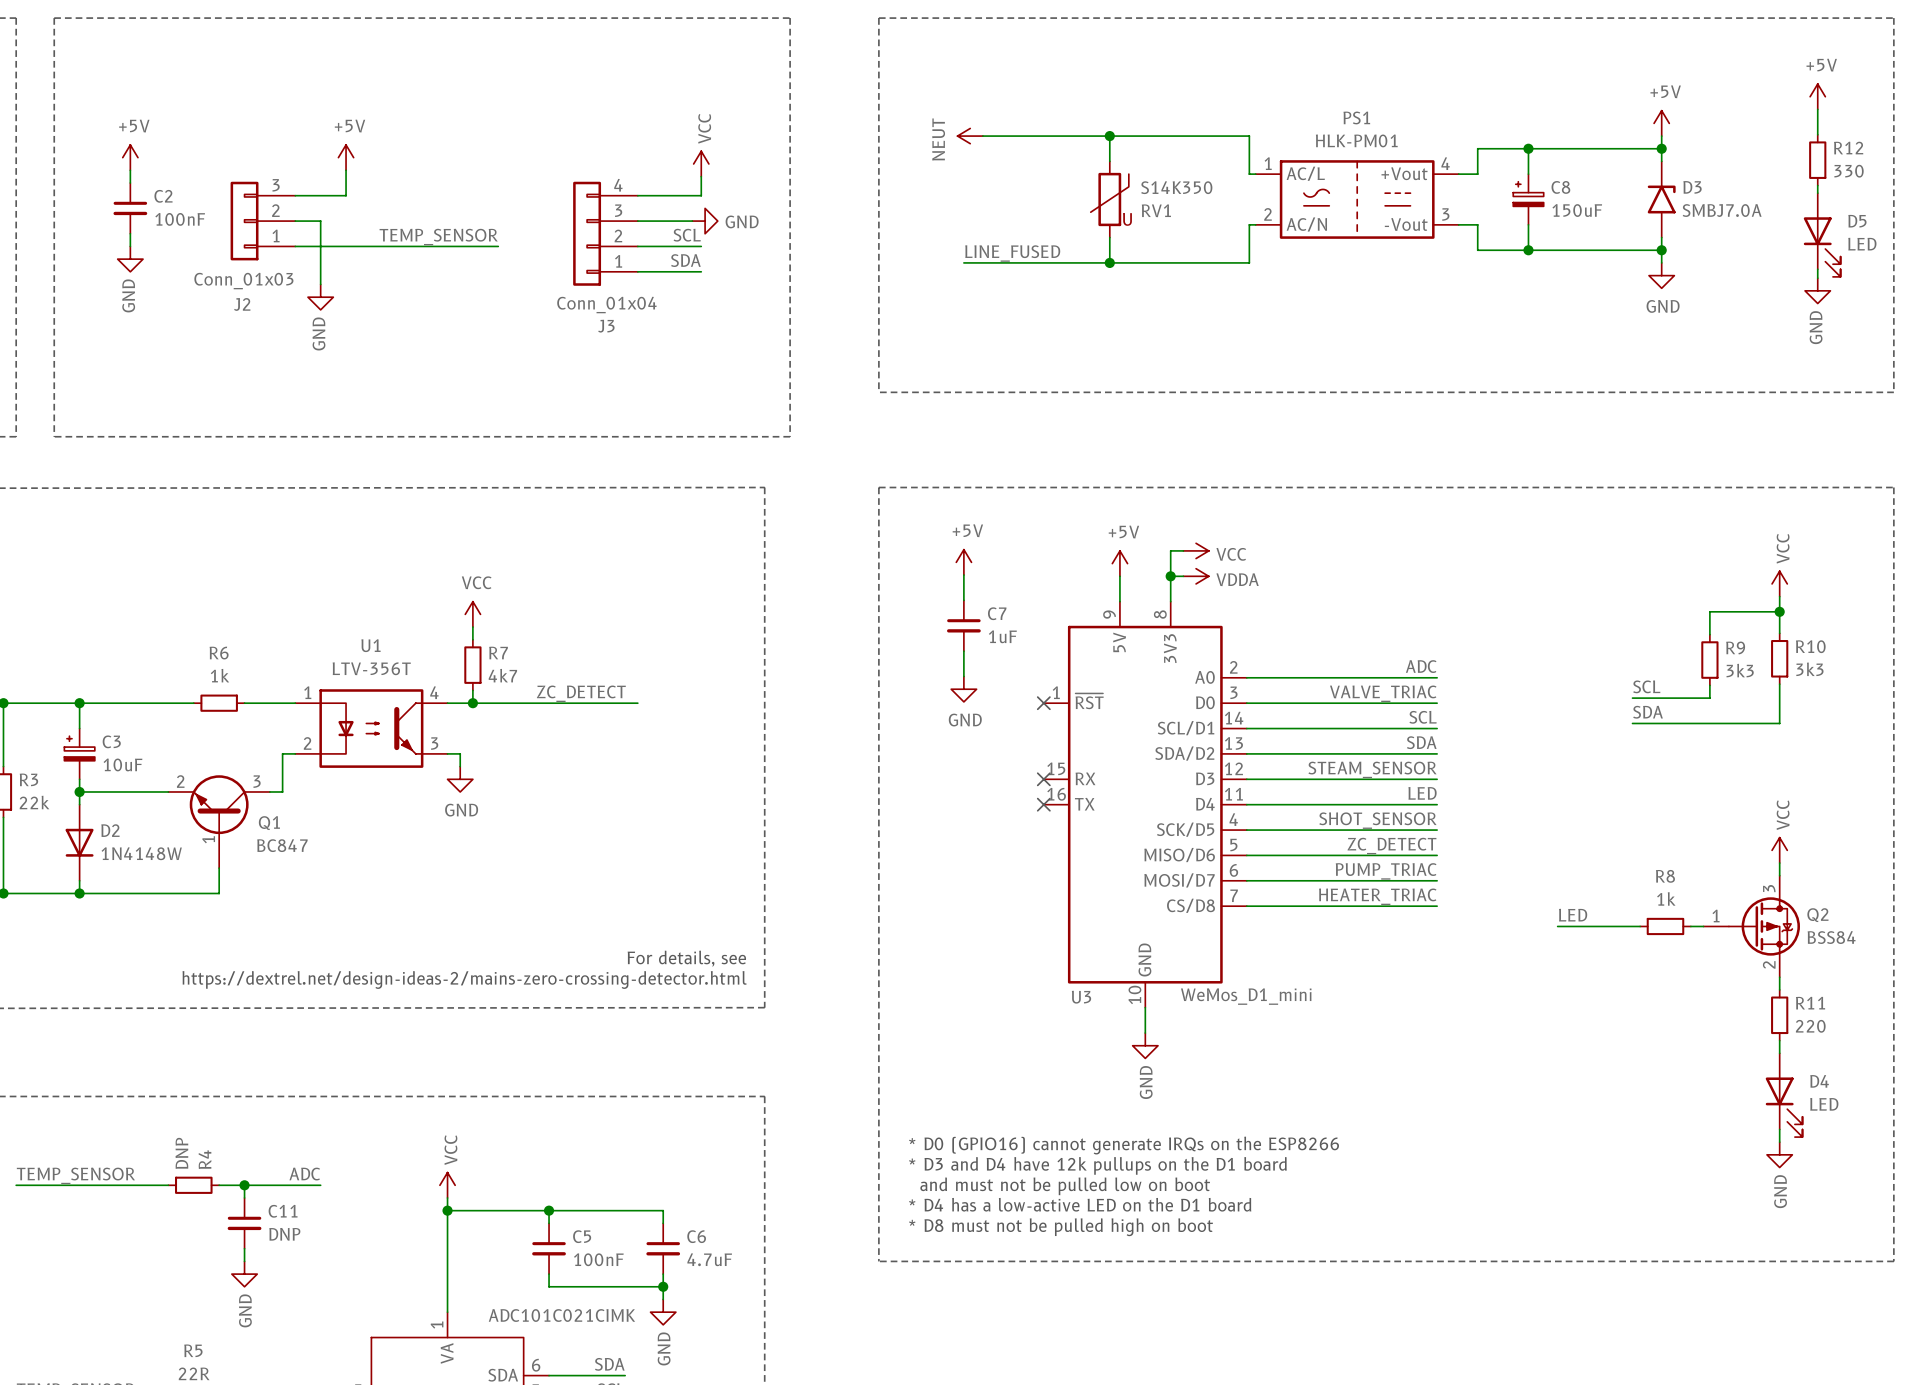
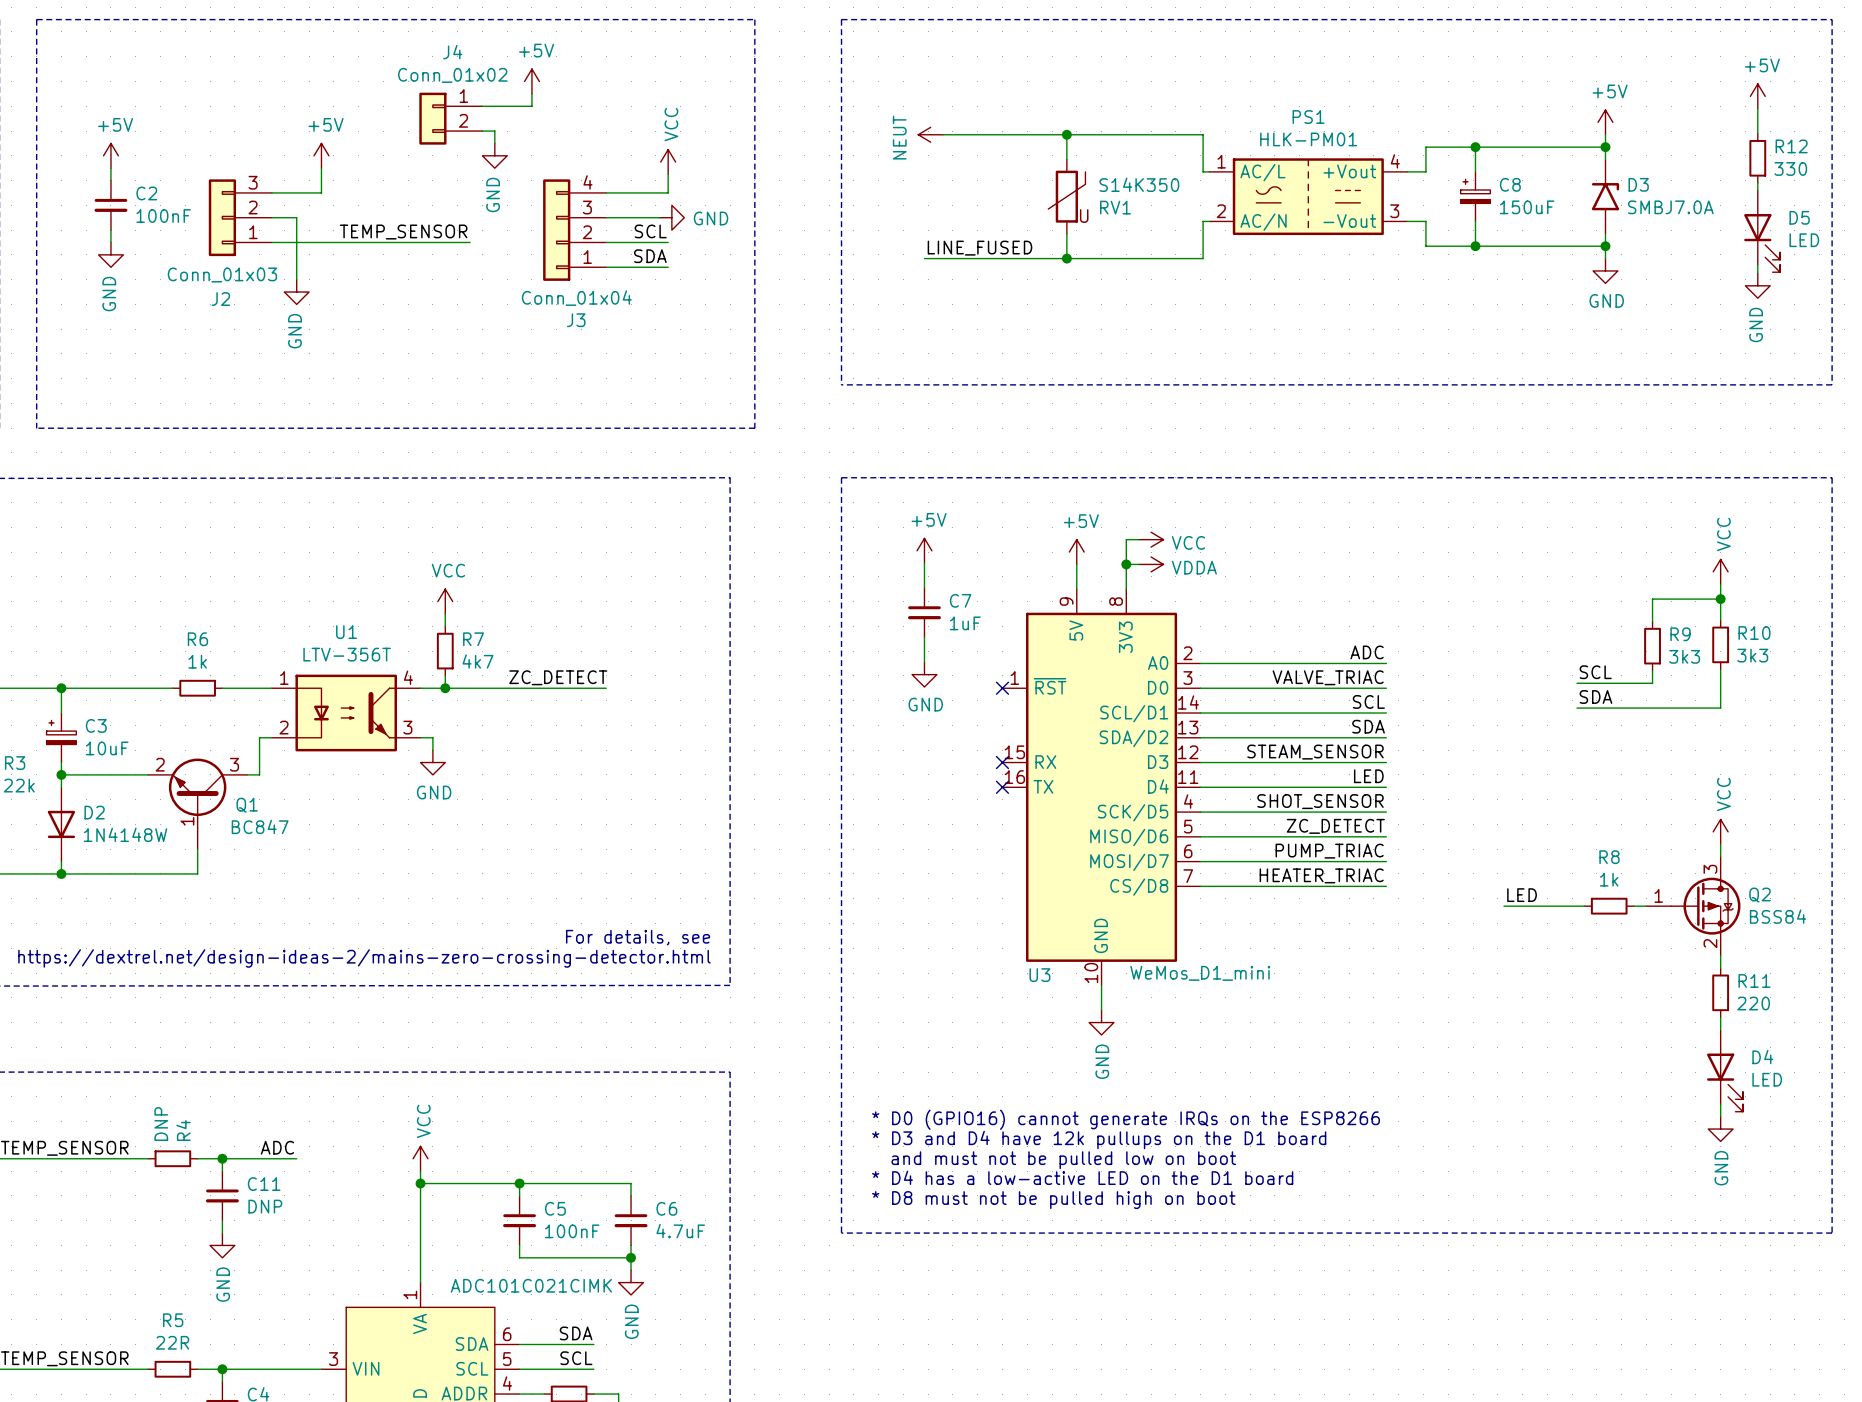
power symbol: none -> +5V (531, 81)
wire: none -> (531, 93) (531, 106) (482, 106)
J4: none -> Conn_01x02 (450, 118)
wire: none -> (482, 131) (494, 131) (494, 143)
power symbol: none -> GND (494, 155)

